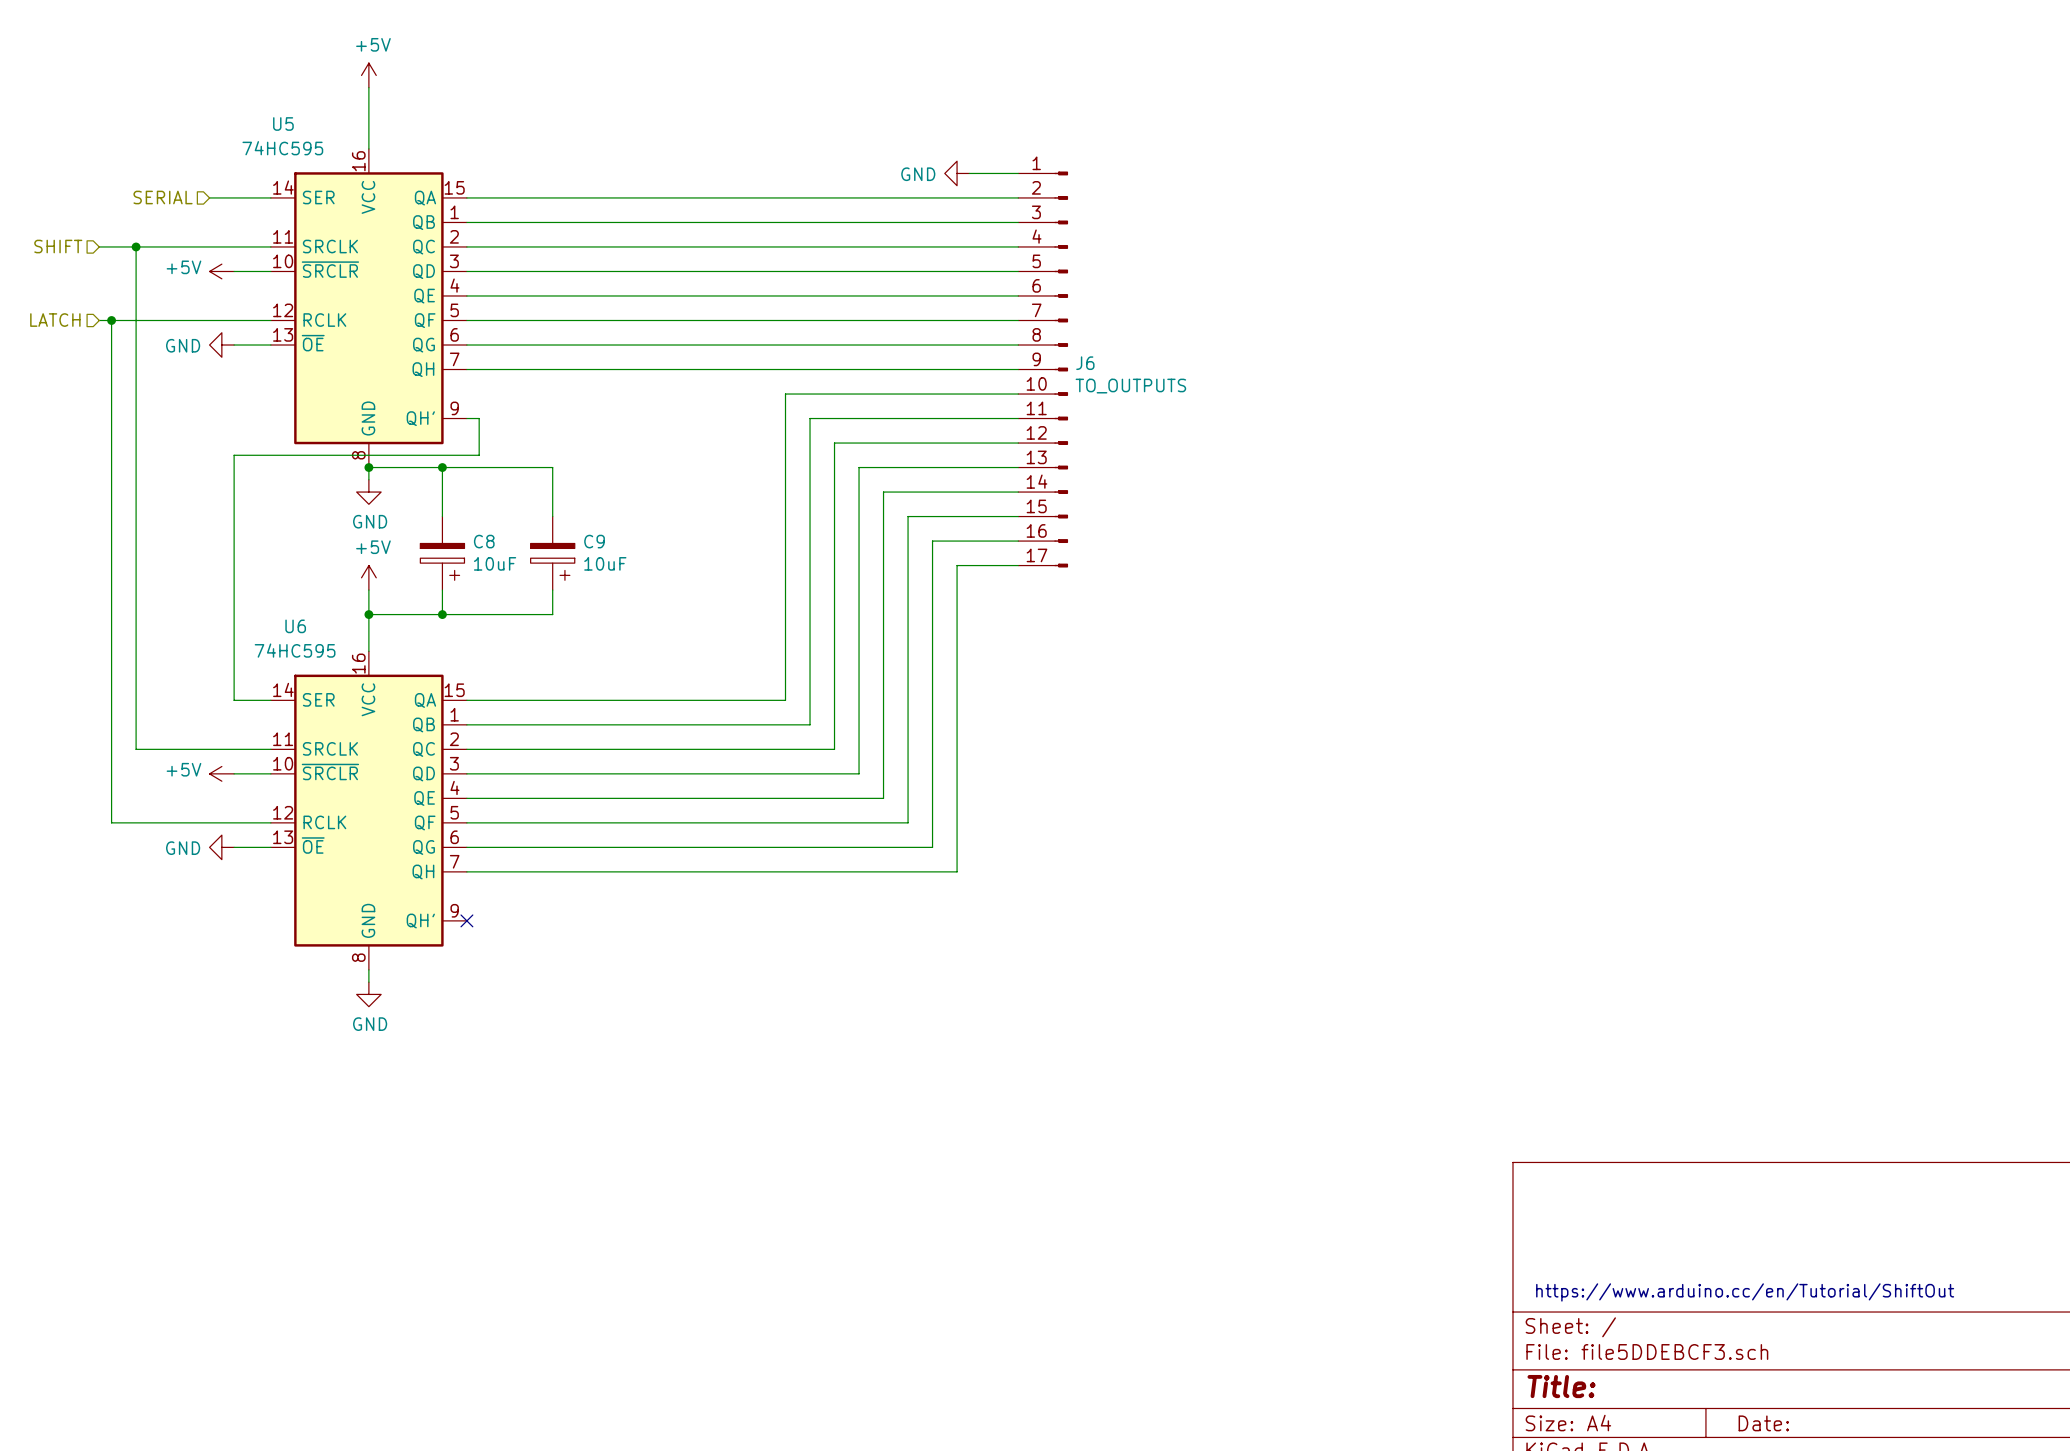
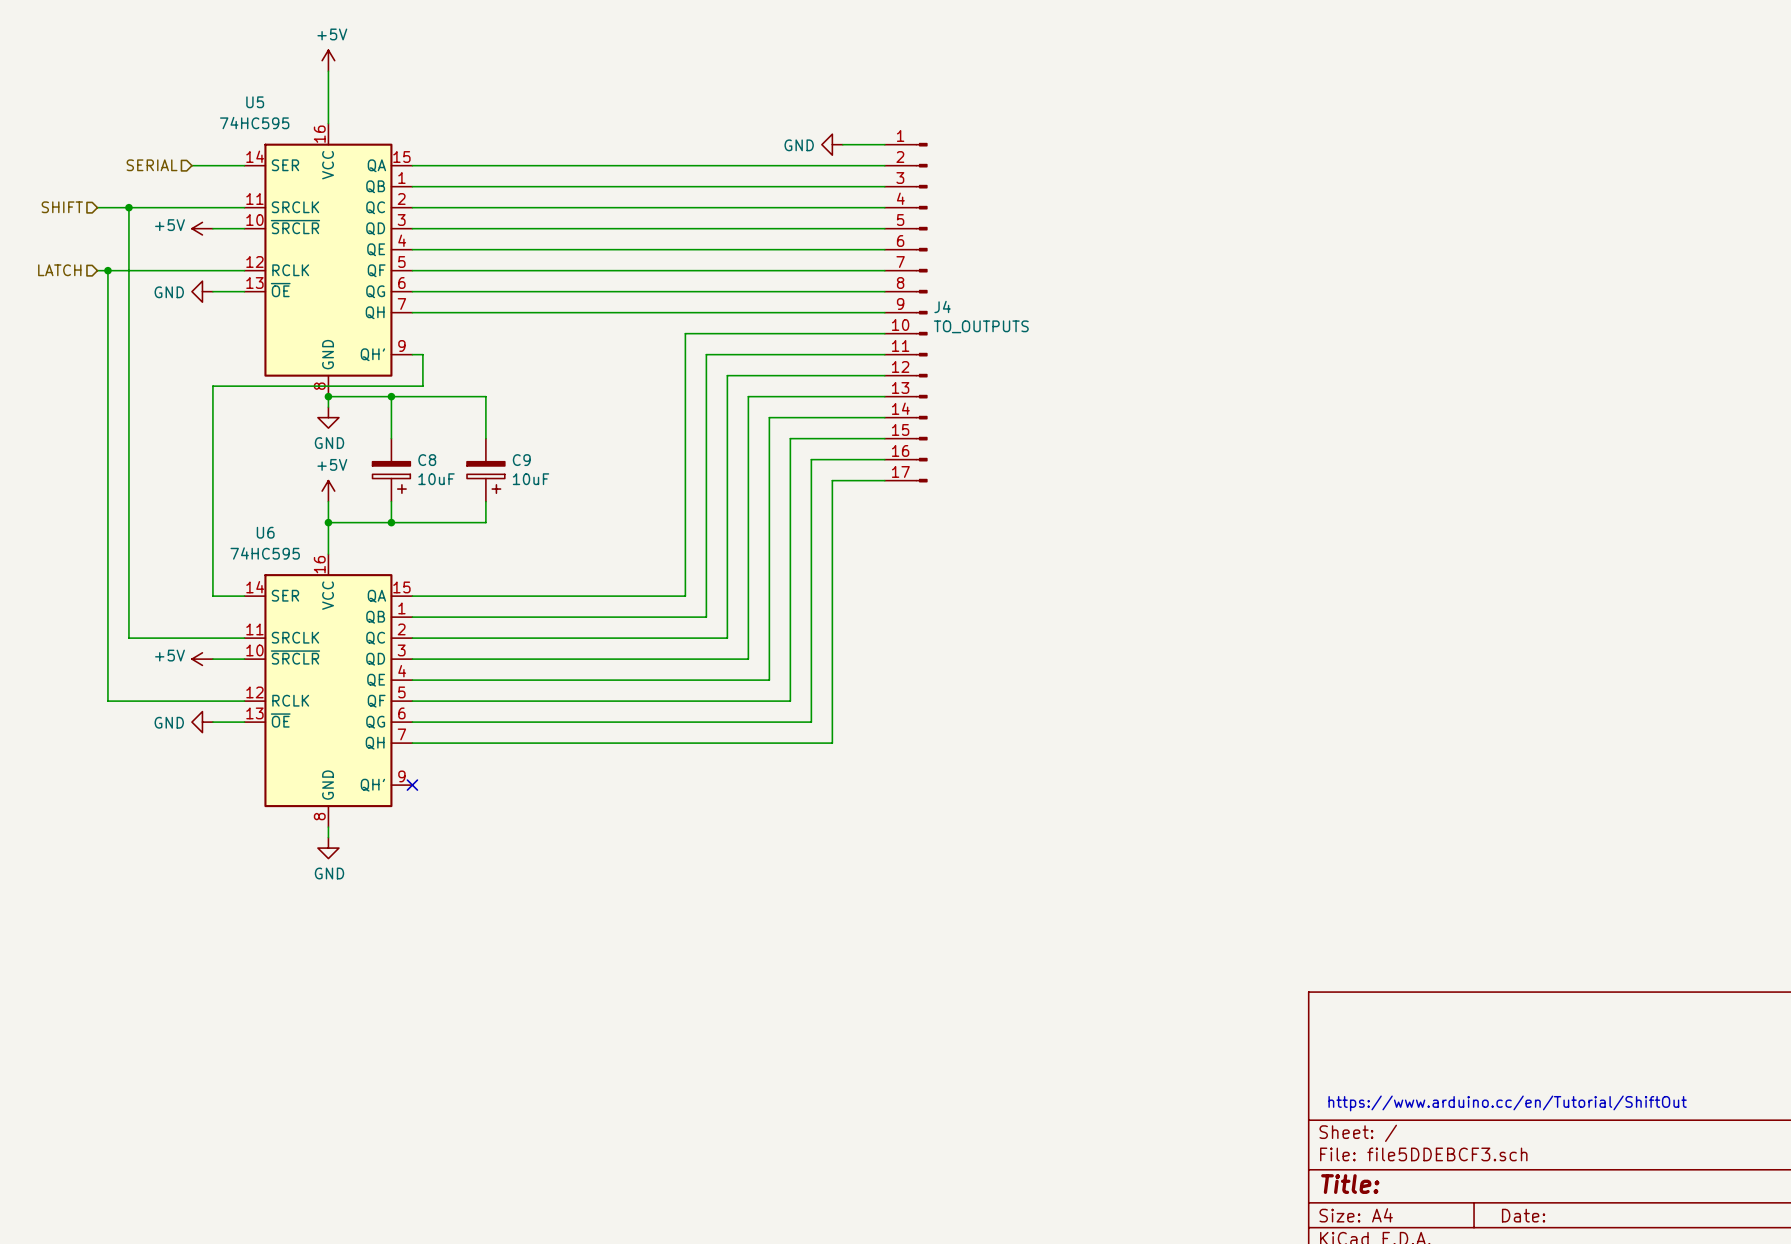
J6 name: J6 (1085, 363) -> J4 (942, 306)

